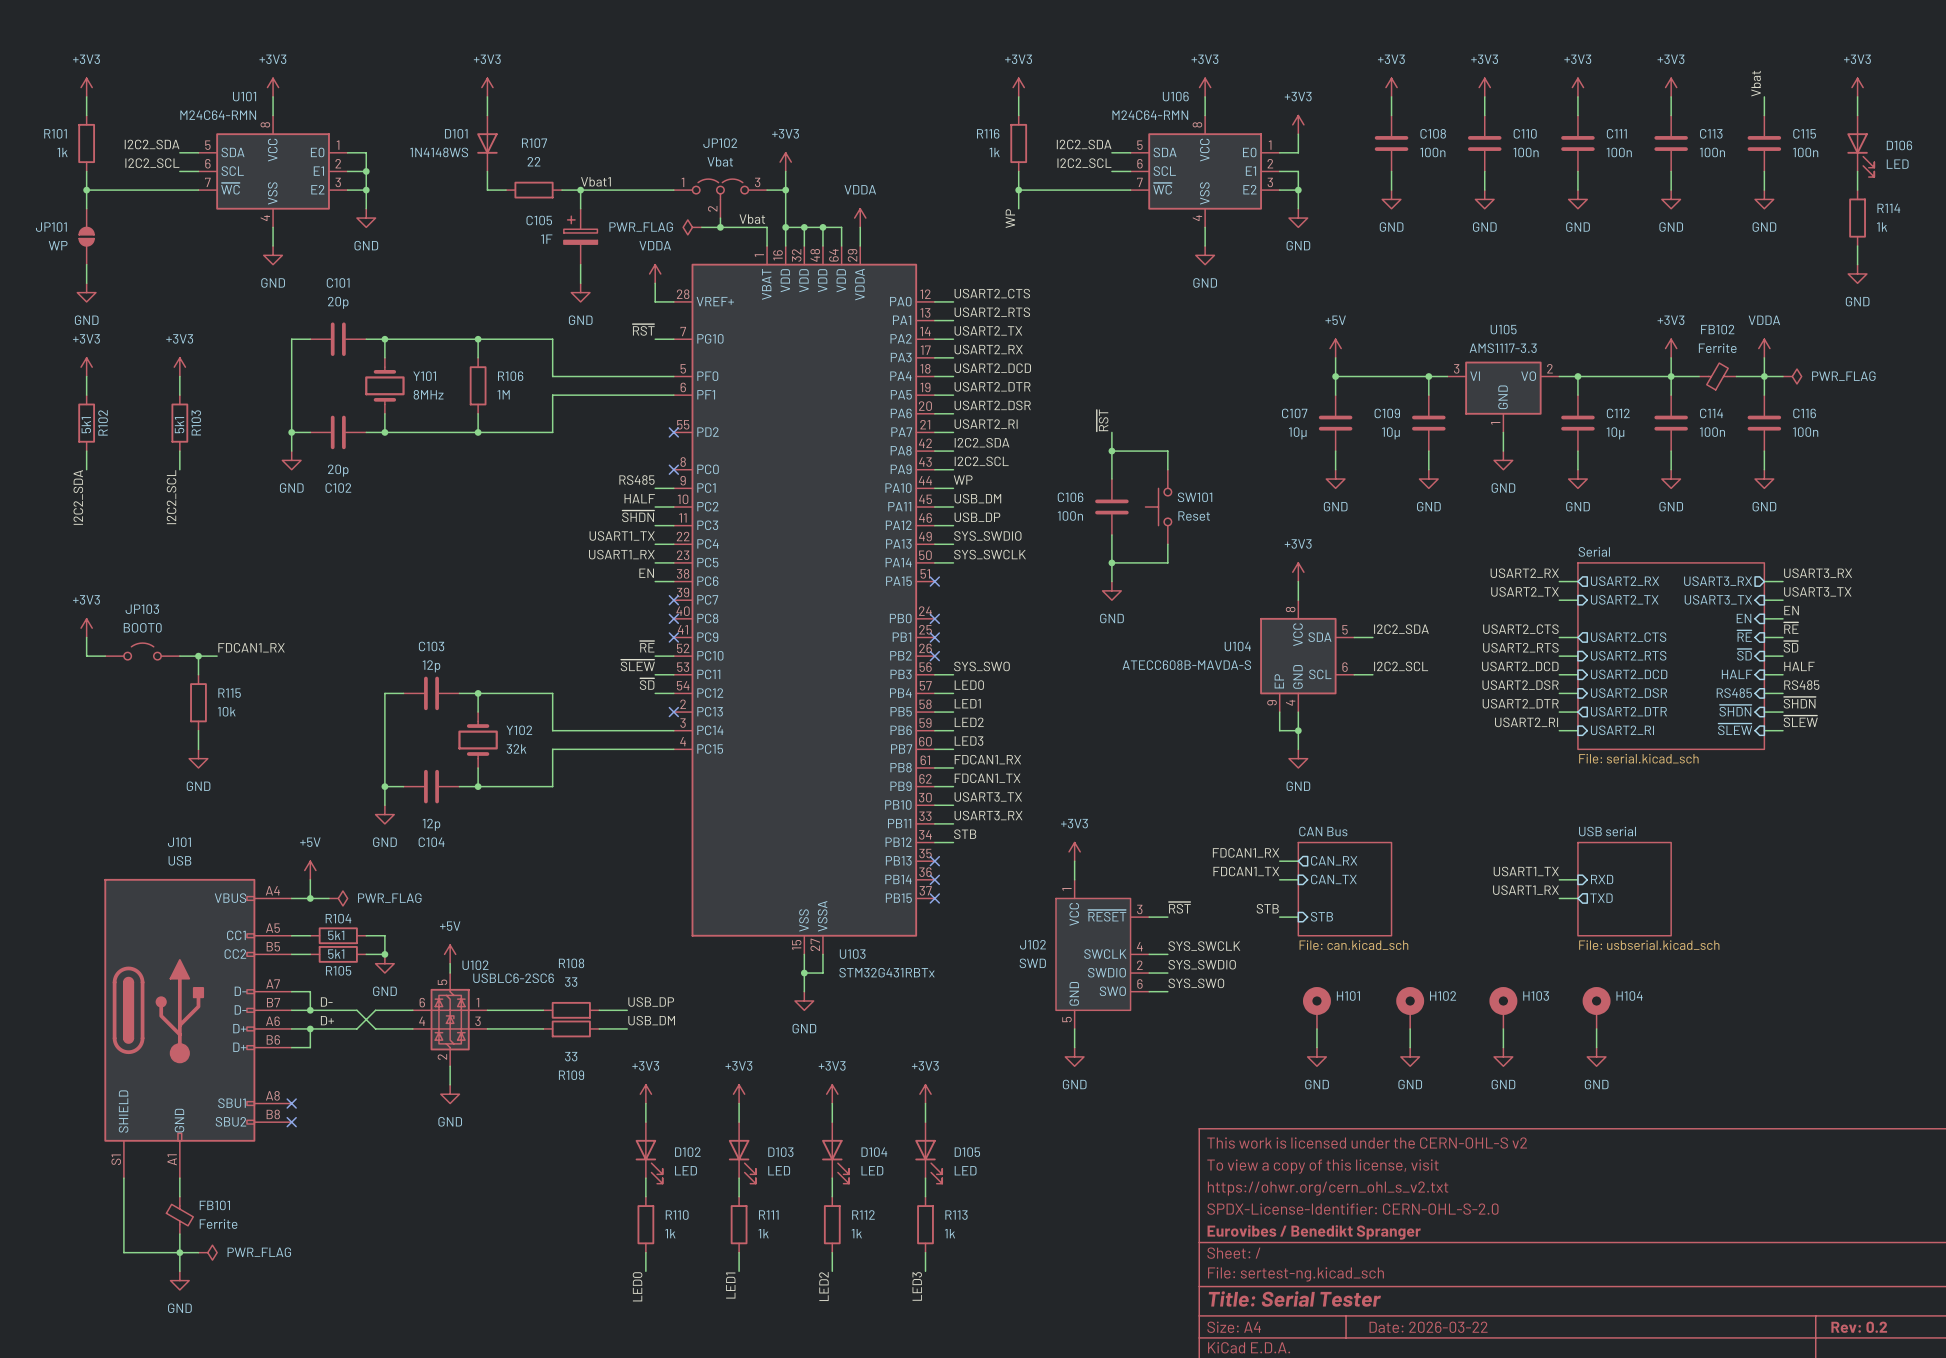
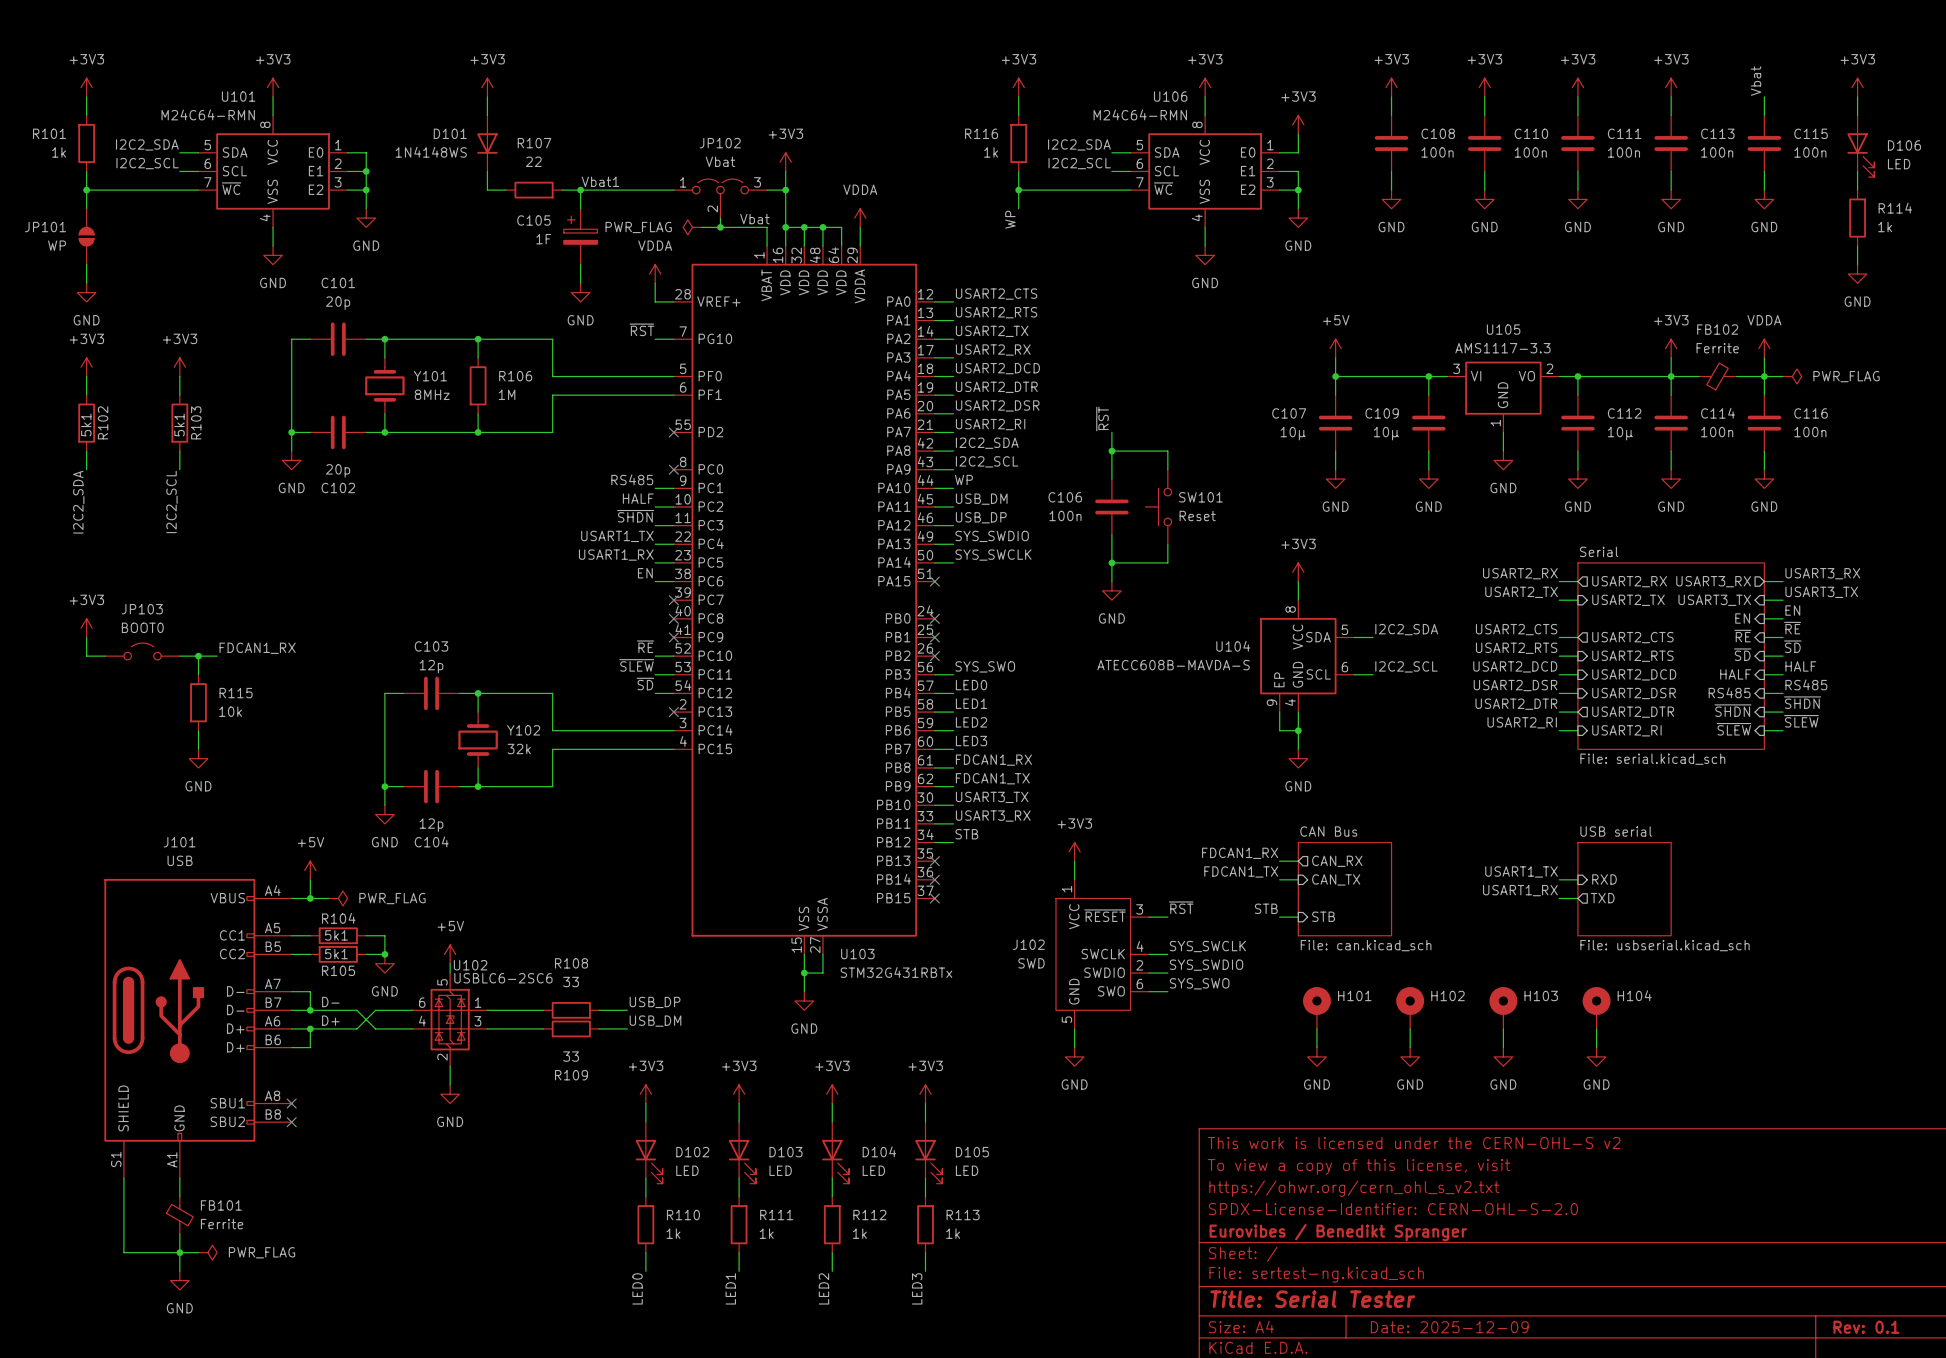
title block: Date: 2026-03-22 (1428, 1327) -> Date: 2025-12-09 (1449, 1327)
title block: Rev: 0.2 (1859, 1327) -> Rev: 0.1 (1866, 1327)

